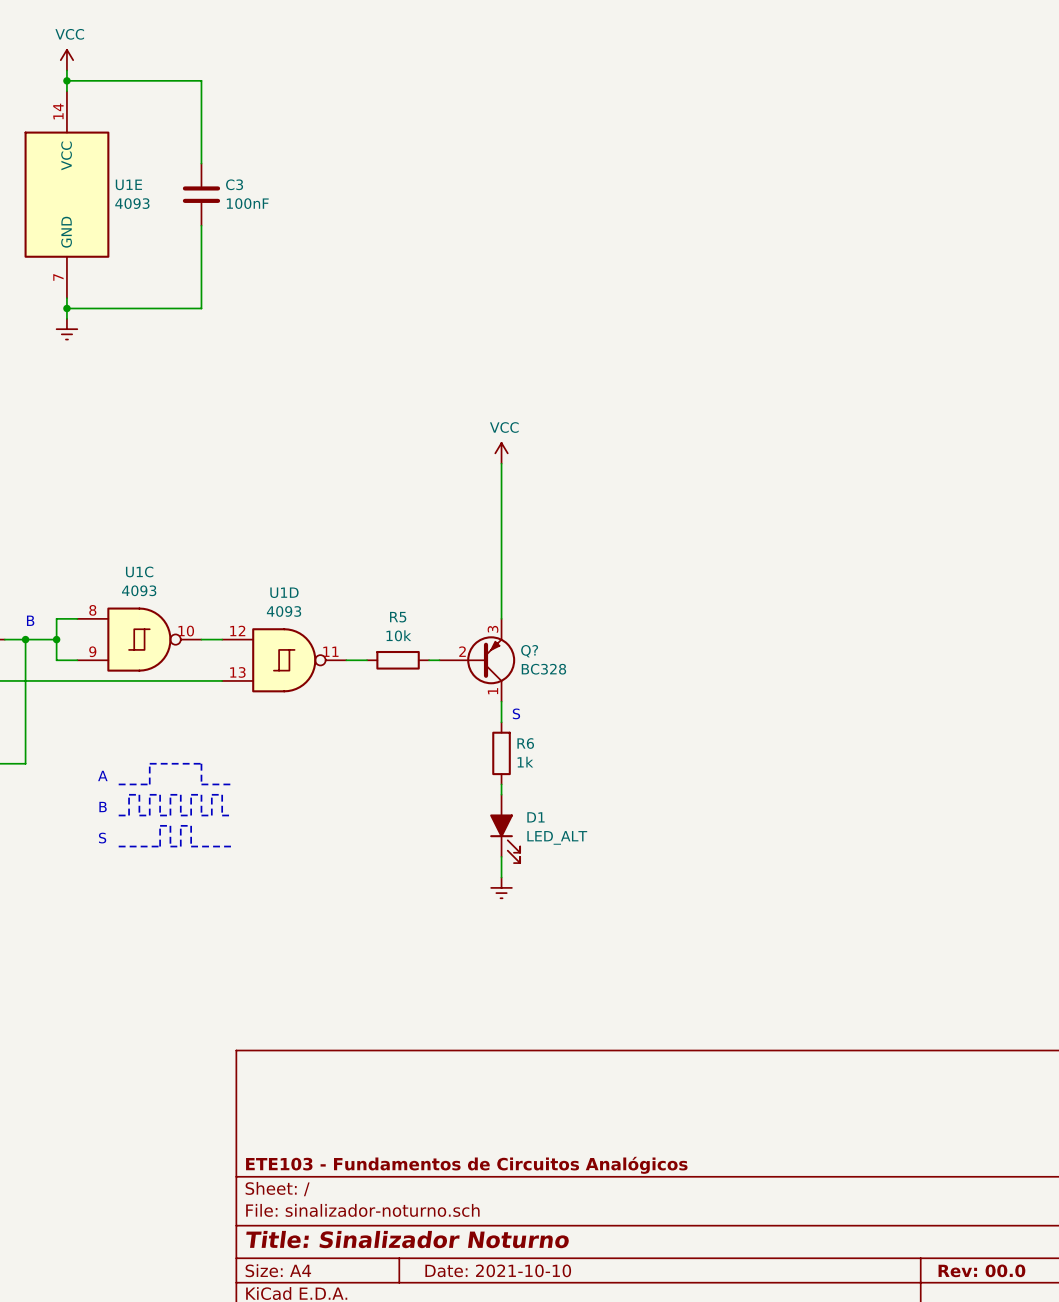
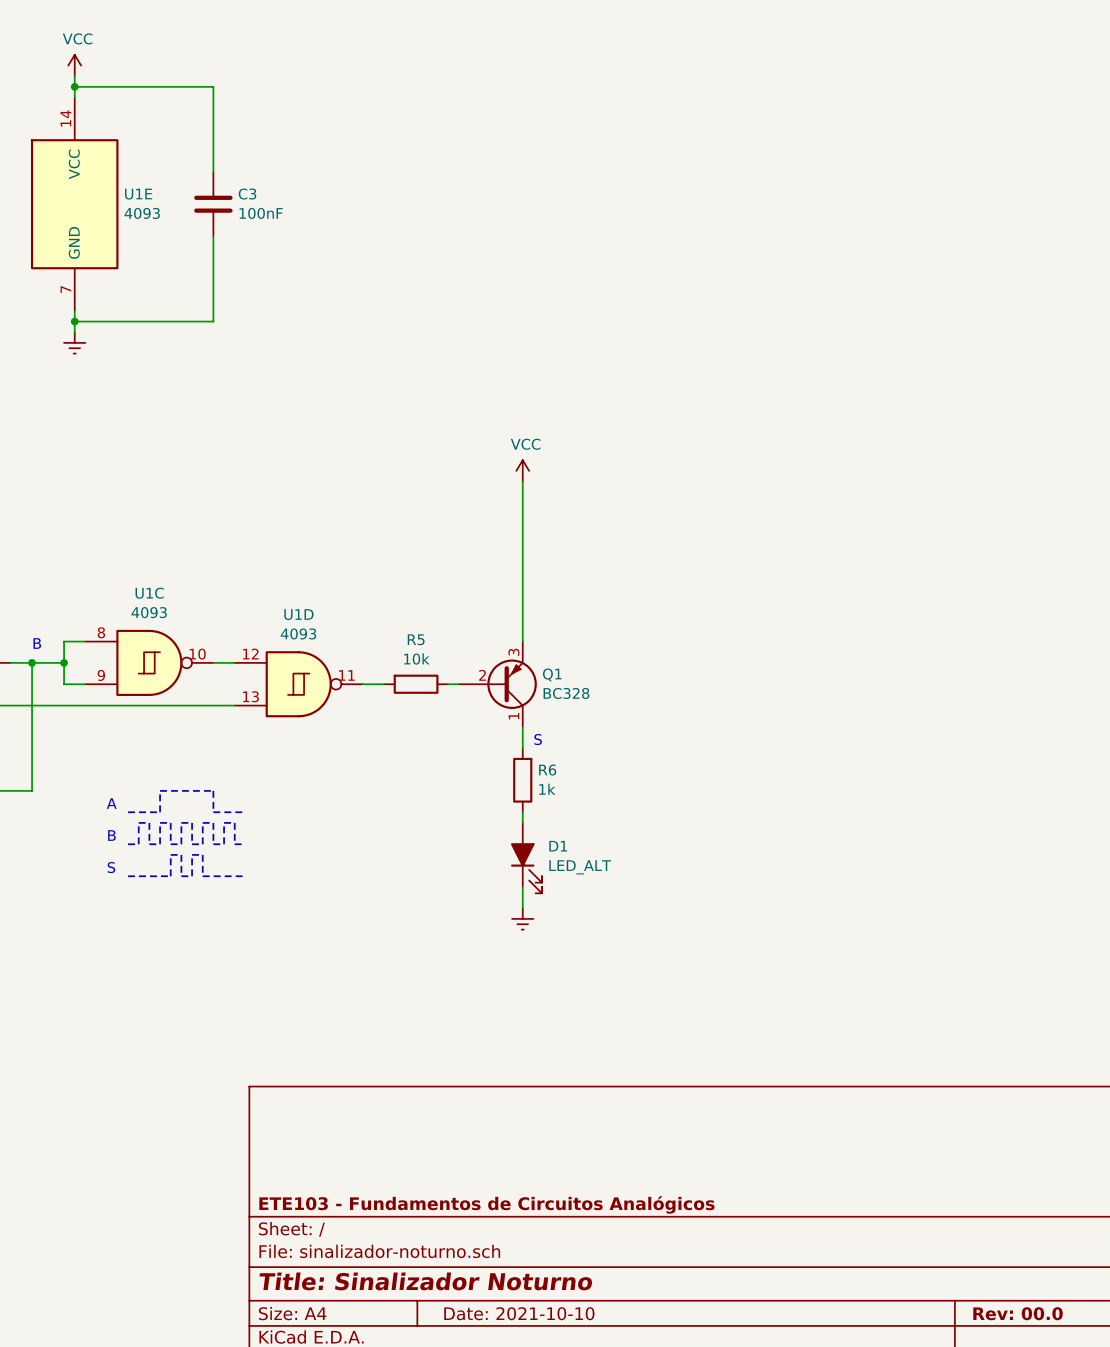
Q? name: Q? (529, 651) -> Q1 (552, 674)

